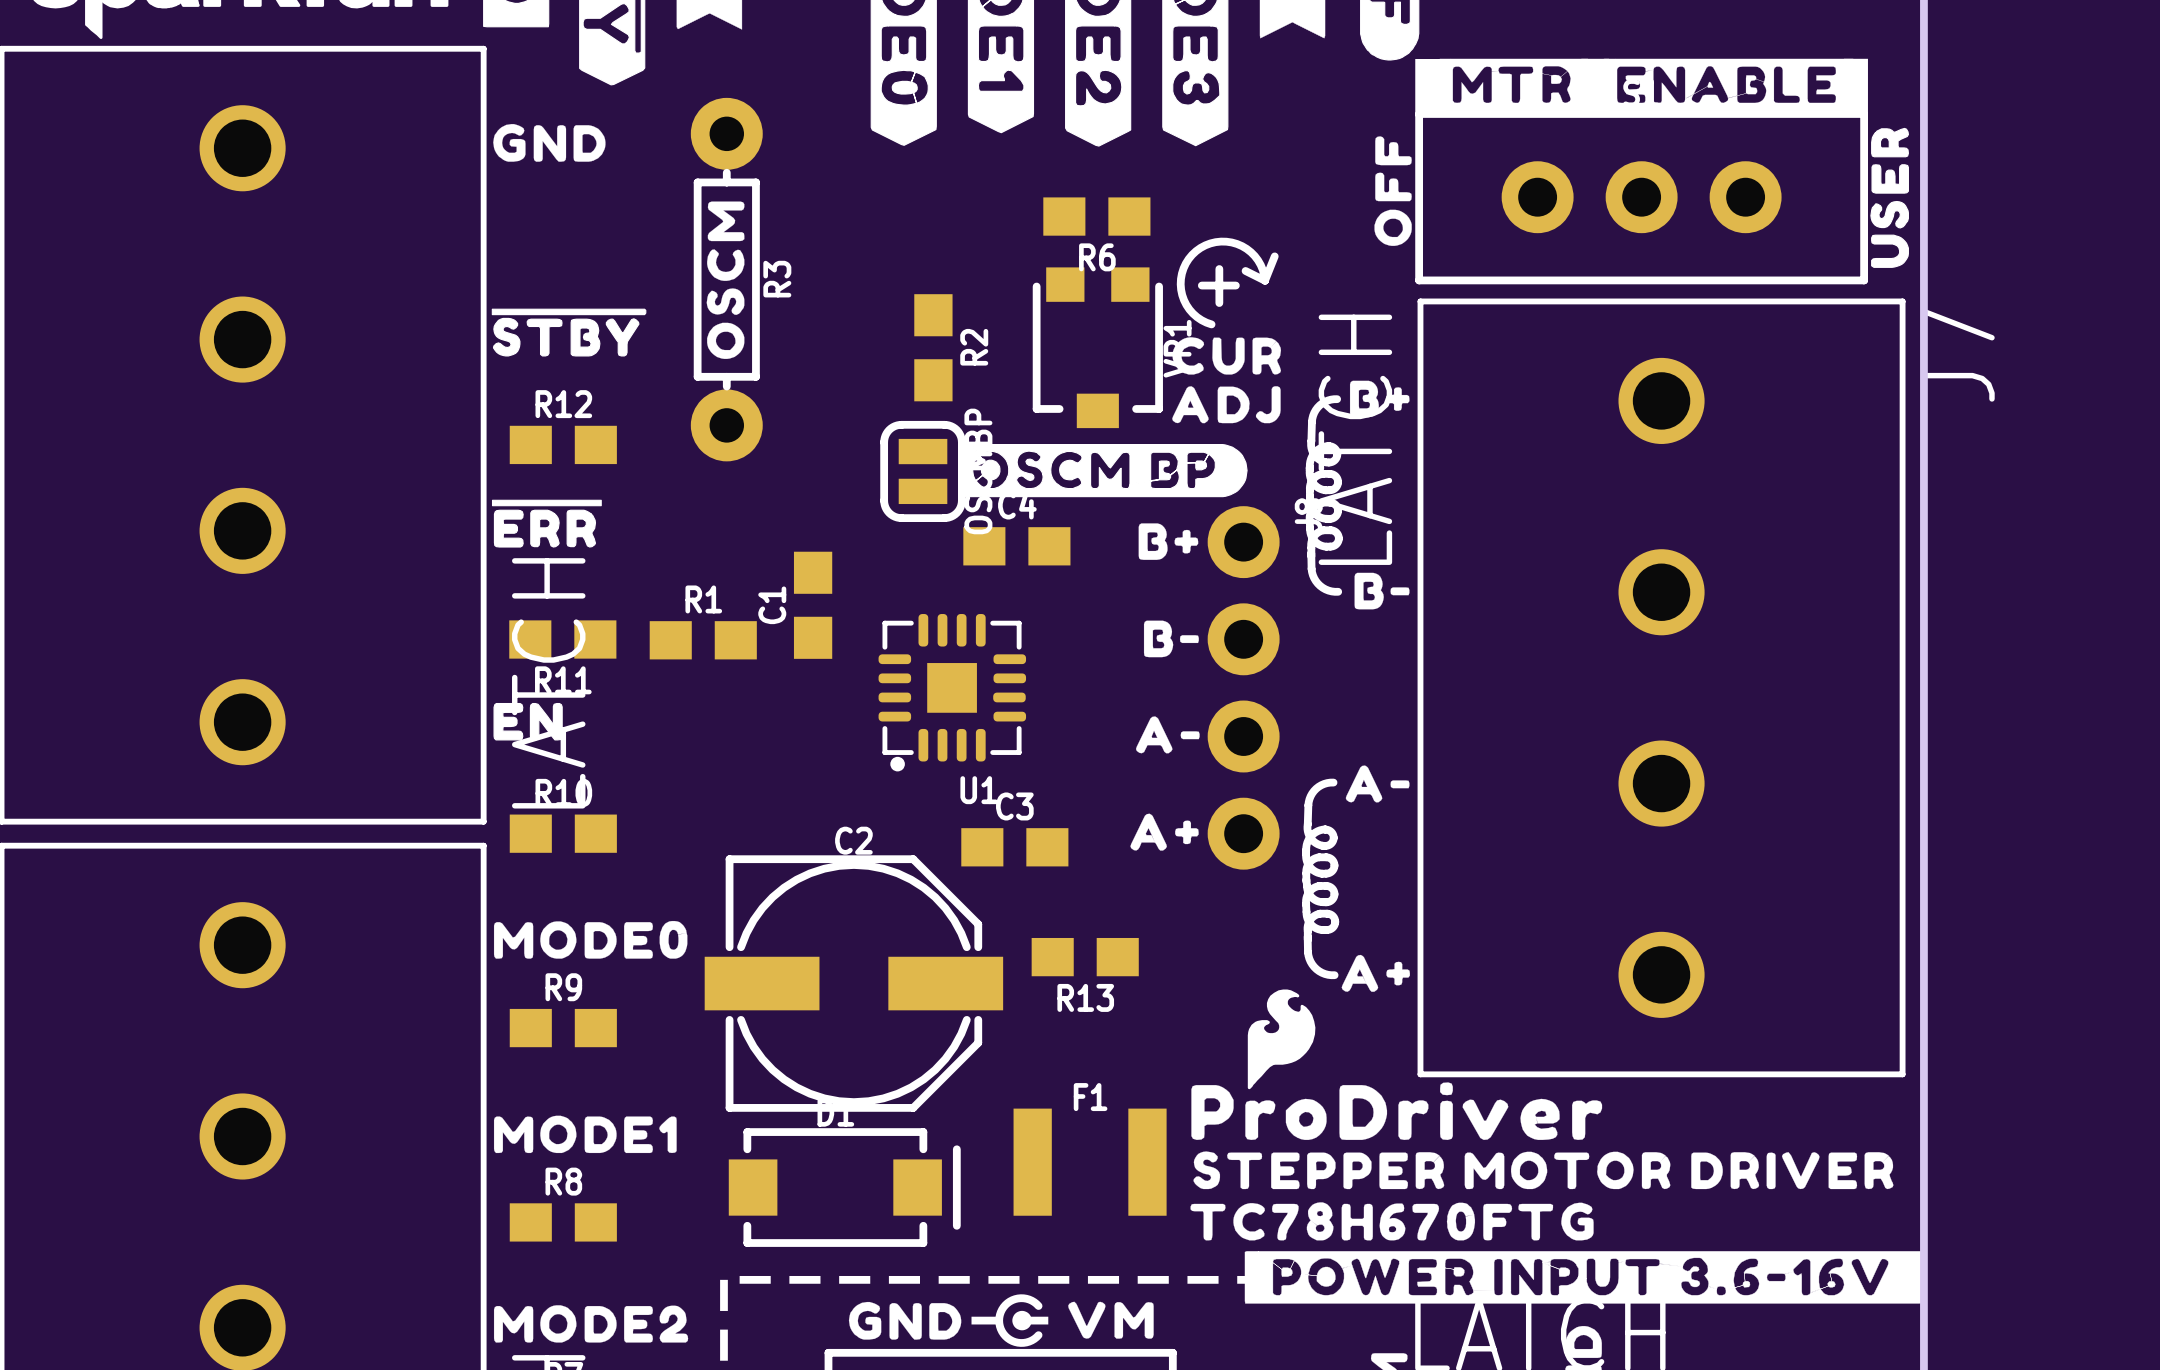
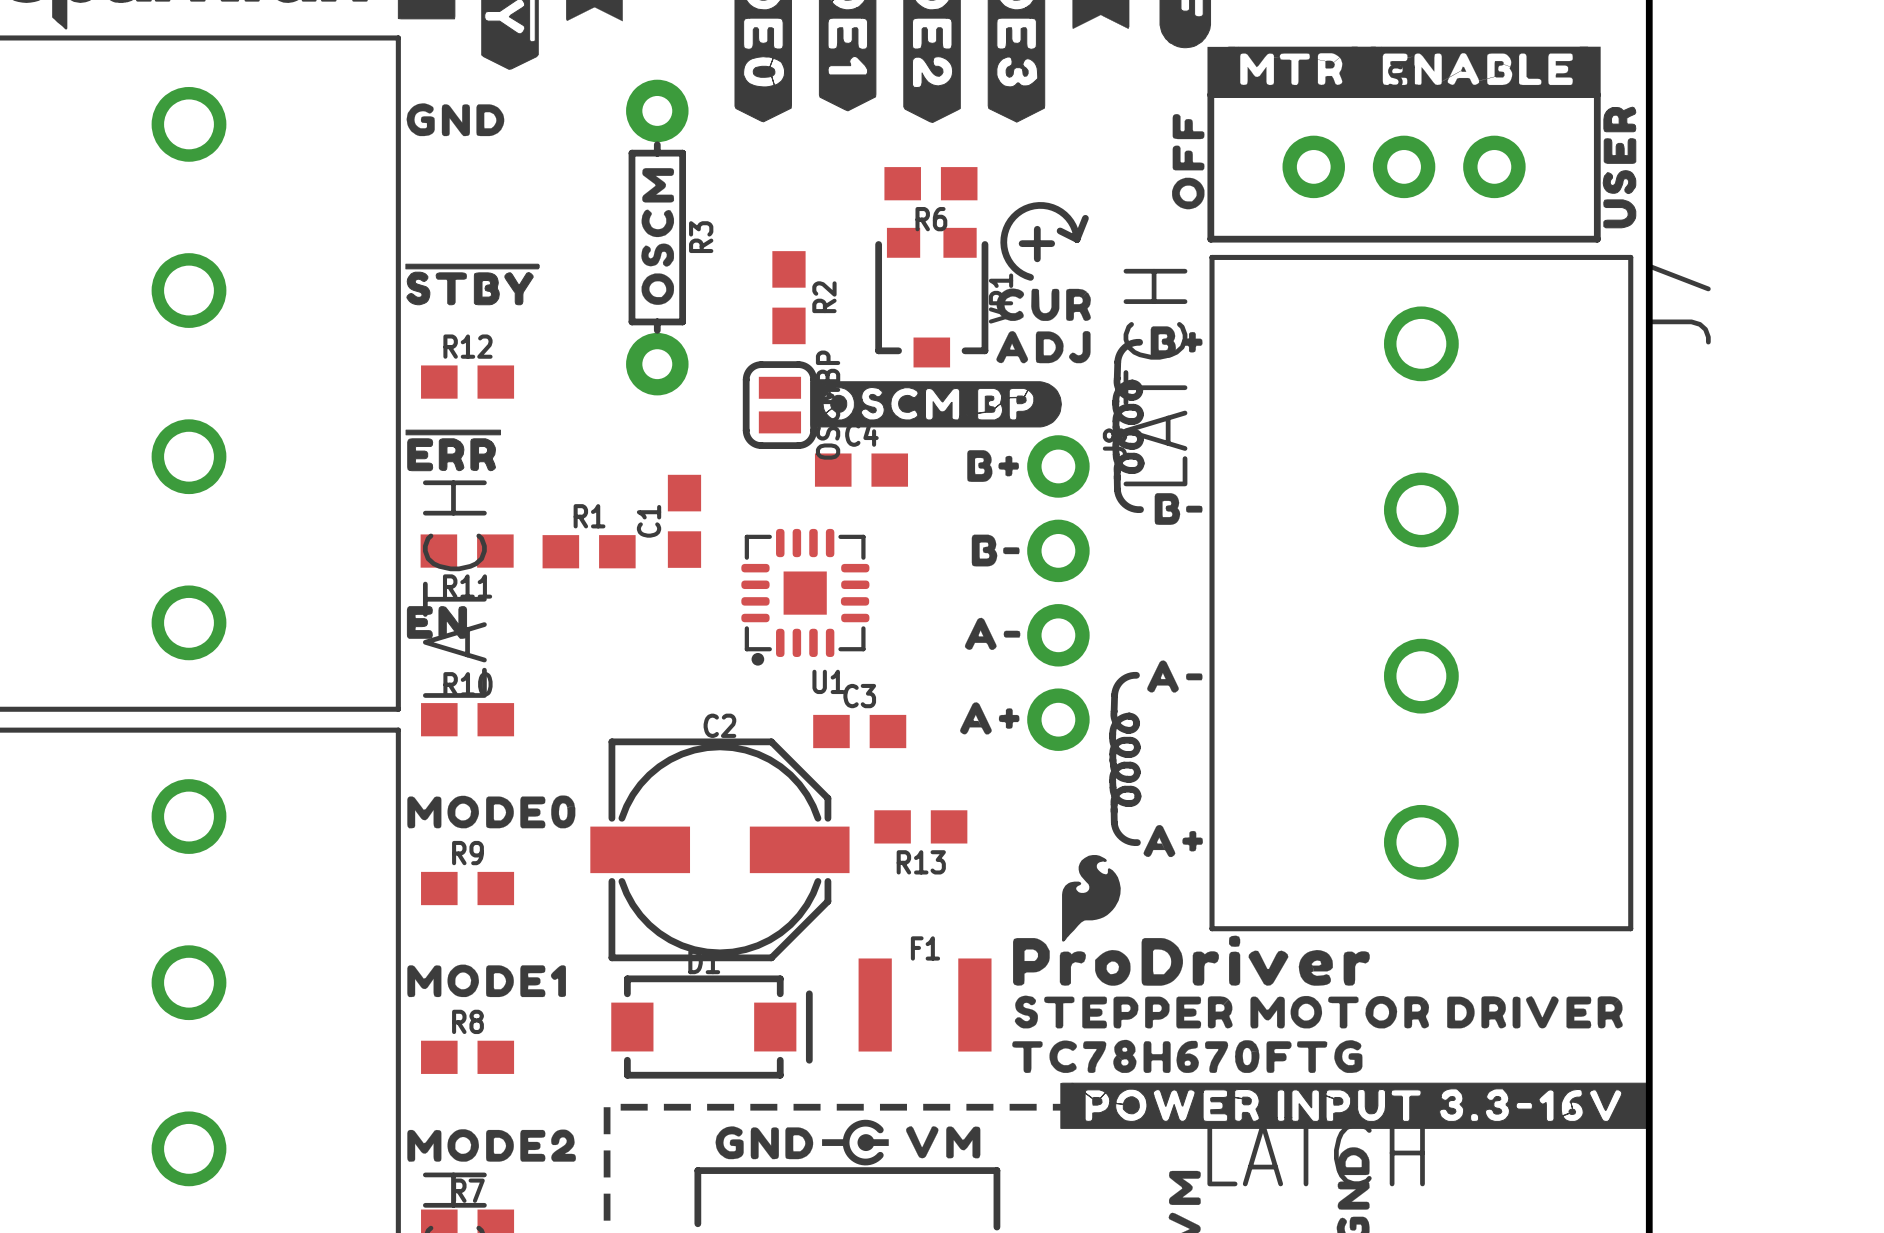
R3 position: (726, 279) -> (657, 237)
drawing position: (725, 280) -> (657, 236)
drawing shape: [1244, 1251, 1922, 1304] -> [1060, 1082, 1651, 1129]

